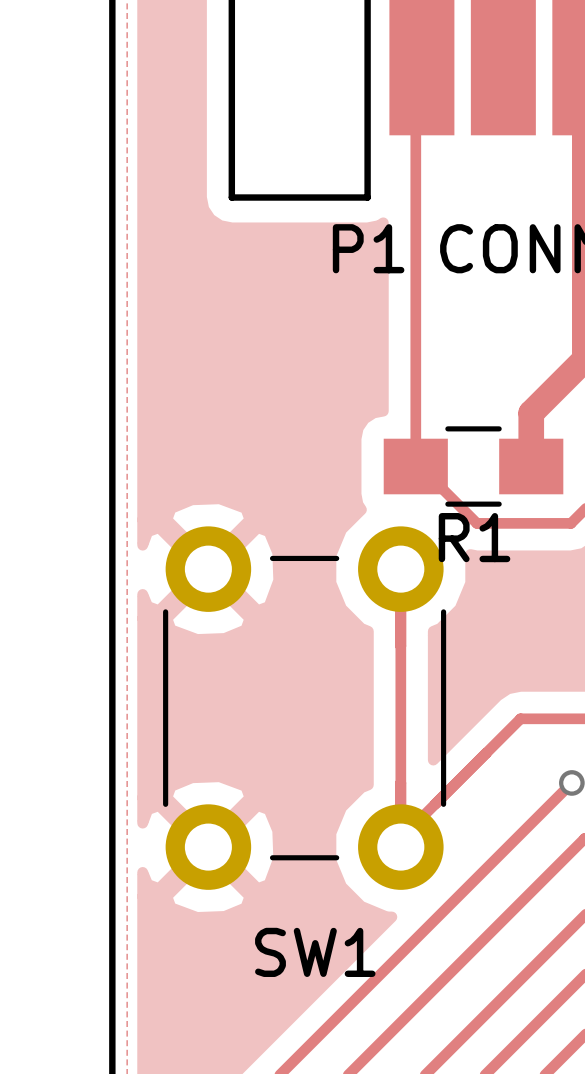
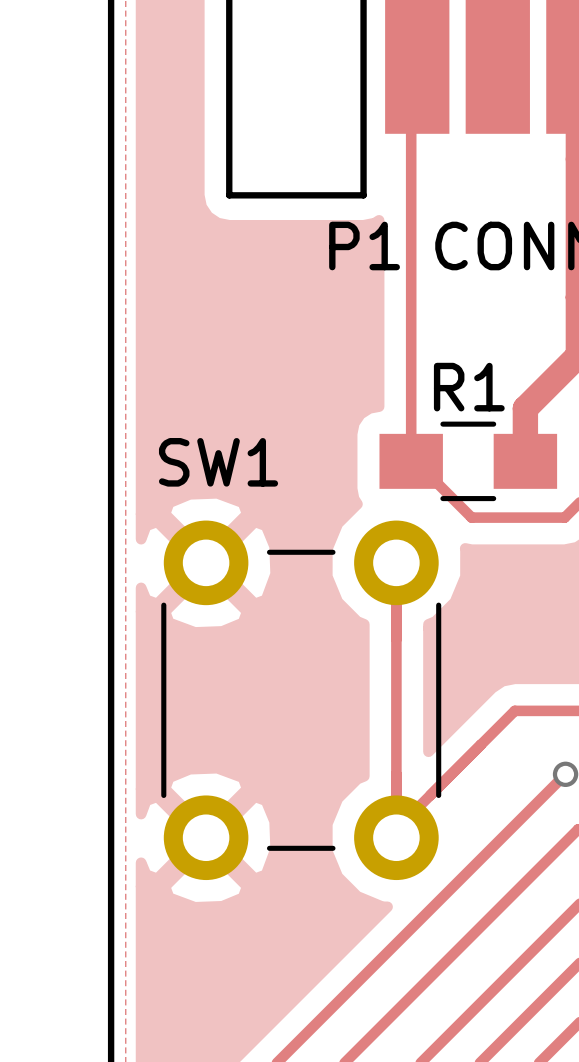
R1 name position: R1 (474, 537) -> R1 (469, 387)
SW1 name position: SW1 (315, 952) -> SW1 (218, 462)

